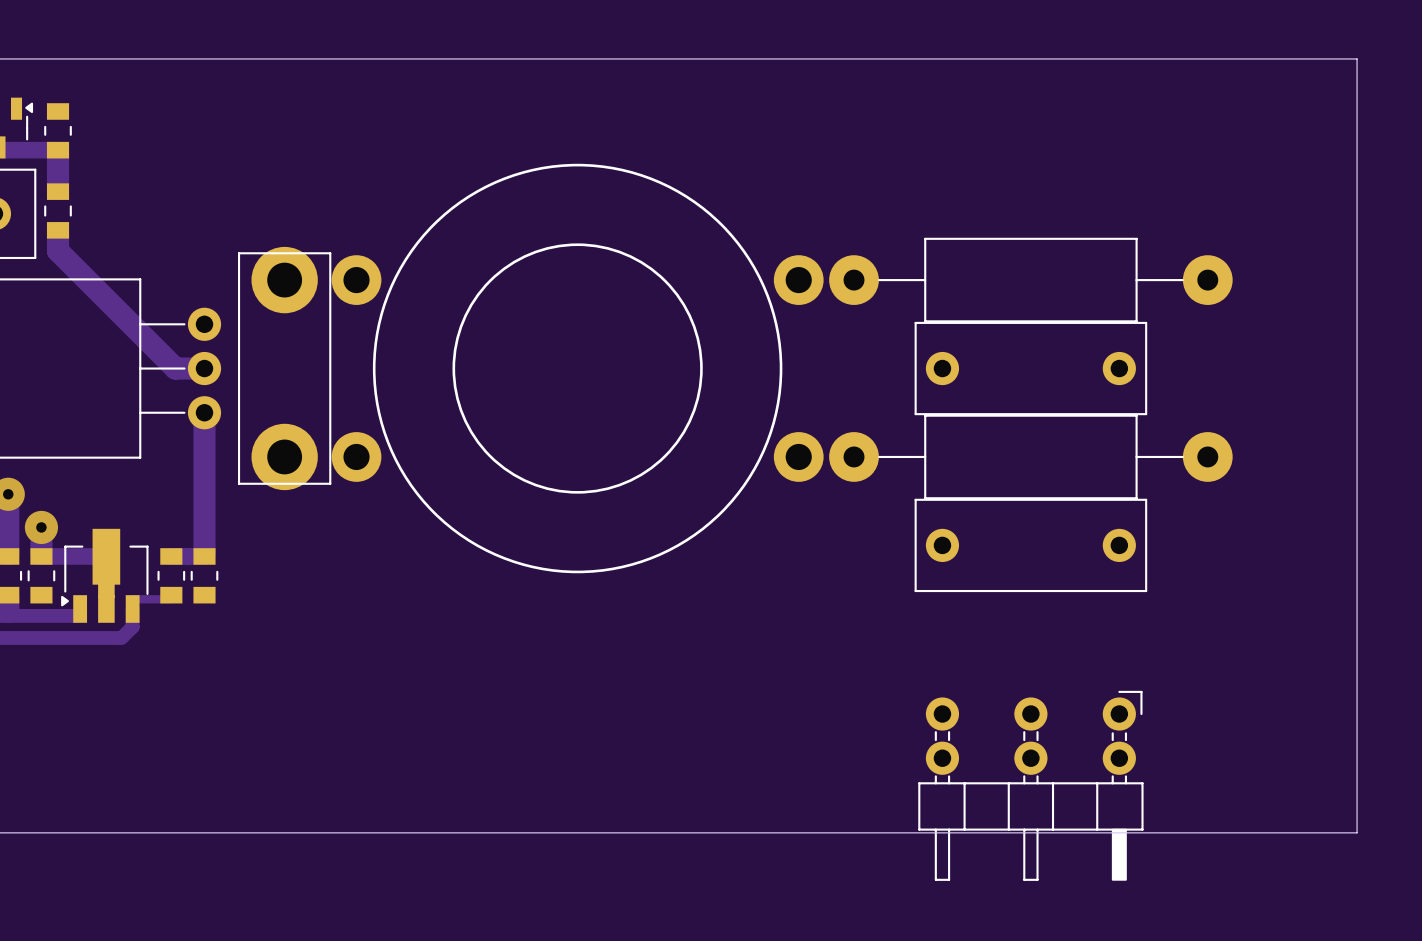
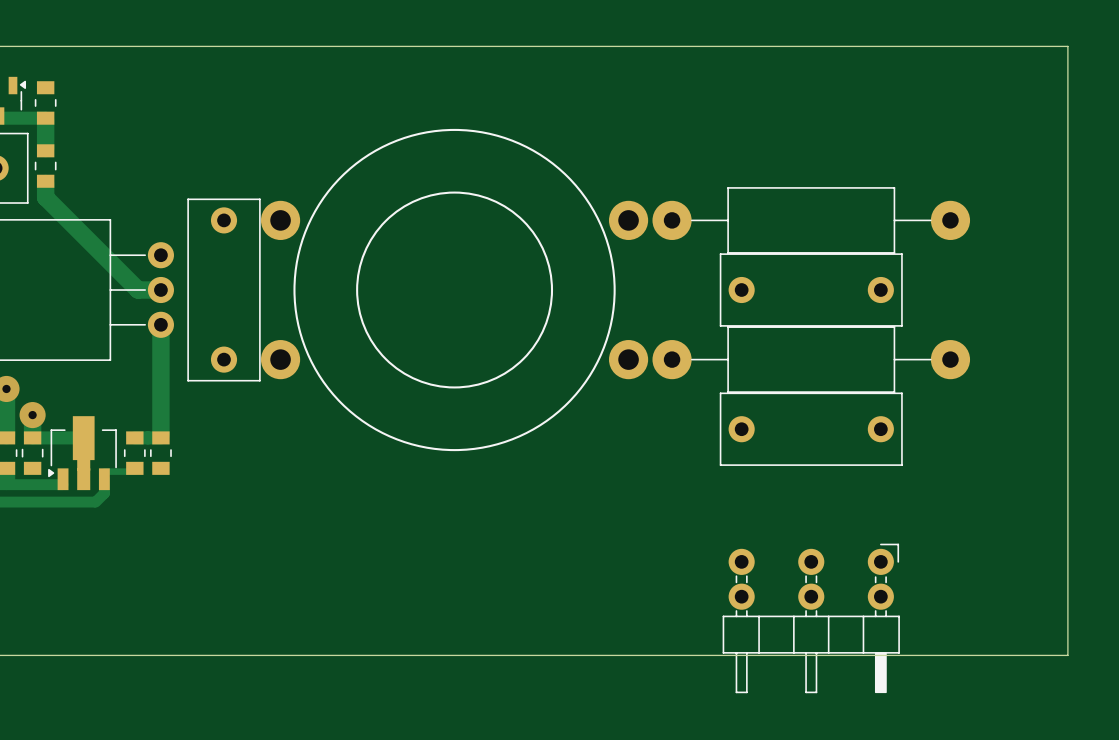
part footprint: [237, 246, 332, 491] -> [187, 198, 261, 382]

